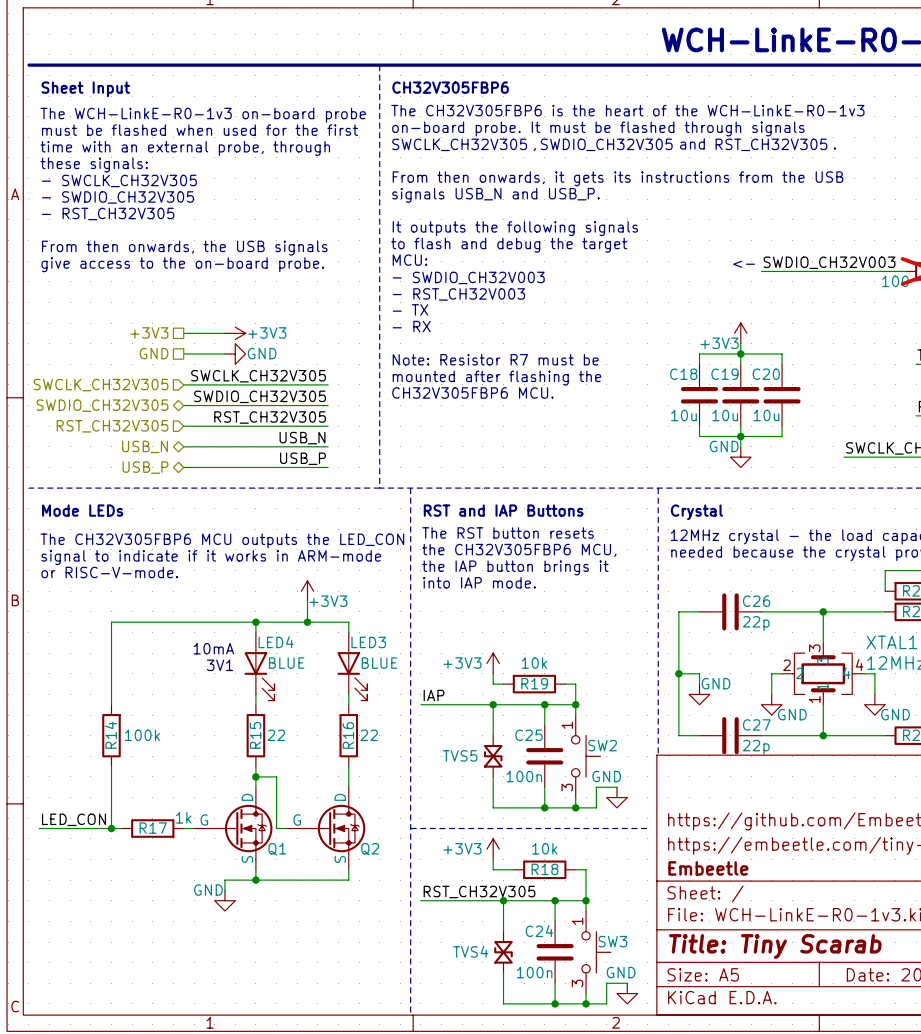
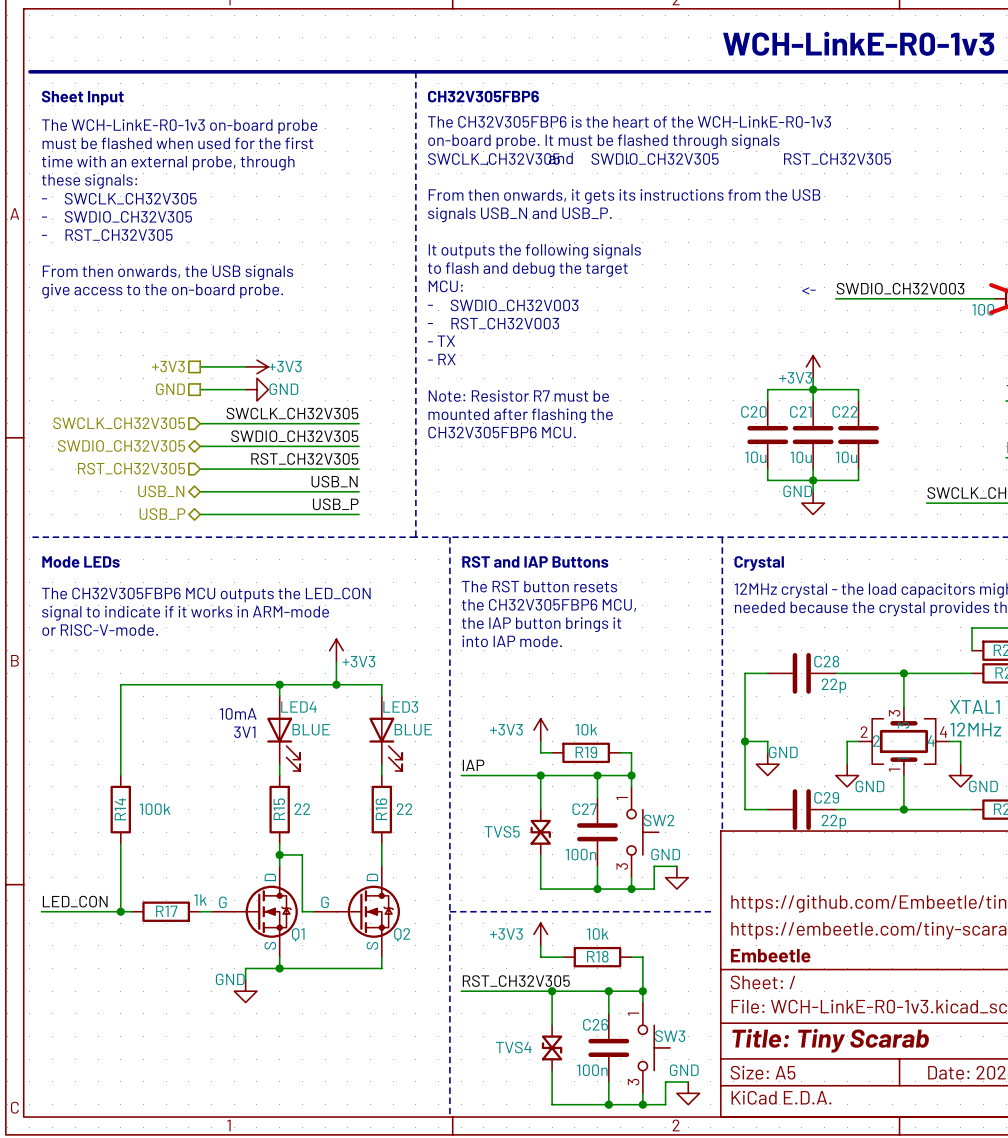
C18 name: C18 (683, 374) -> C20 (753, 411)
C19 name: C19 (724, 374) -> C21 (800, 411)
C20 name: C20 (766, 374) -> C22 (845, 411)
C26 name: C26 (756, 601) -> C28 (826, 661)
C27 name: C27 (756, 724) -> C29 (826, 797)
C25 name: C25 (528, 735) -> C27 (584, 809)
C24 name: C24 (539, 931) -> C26 (595, 1024)

